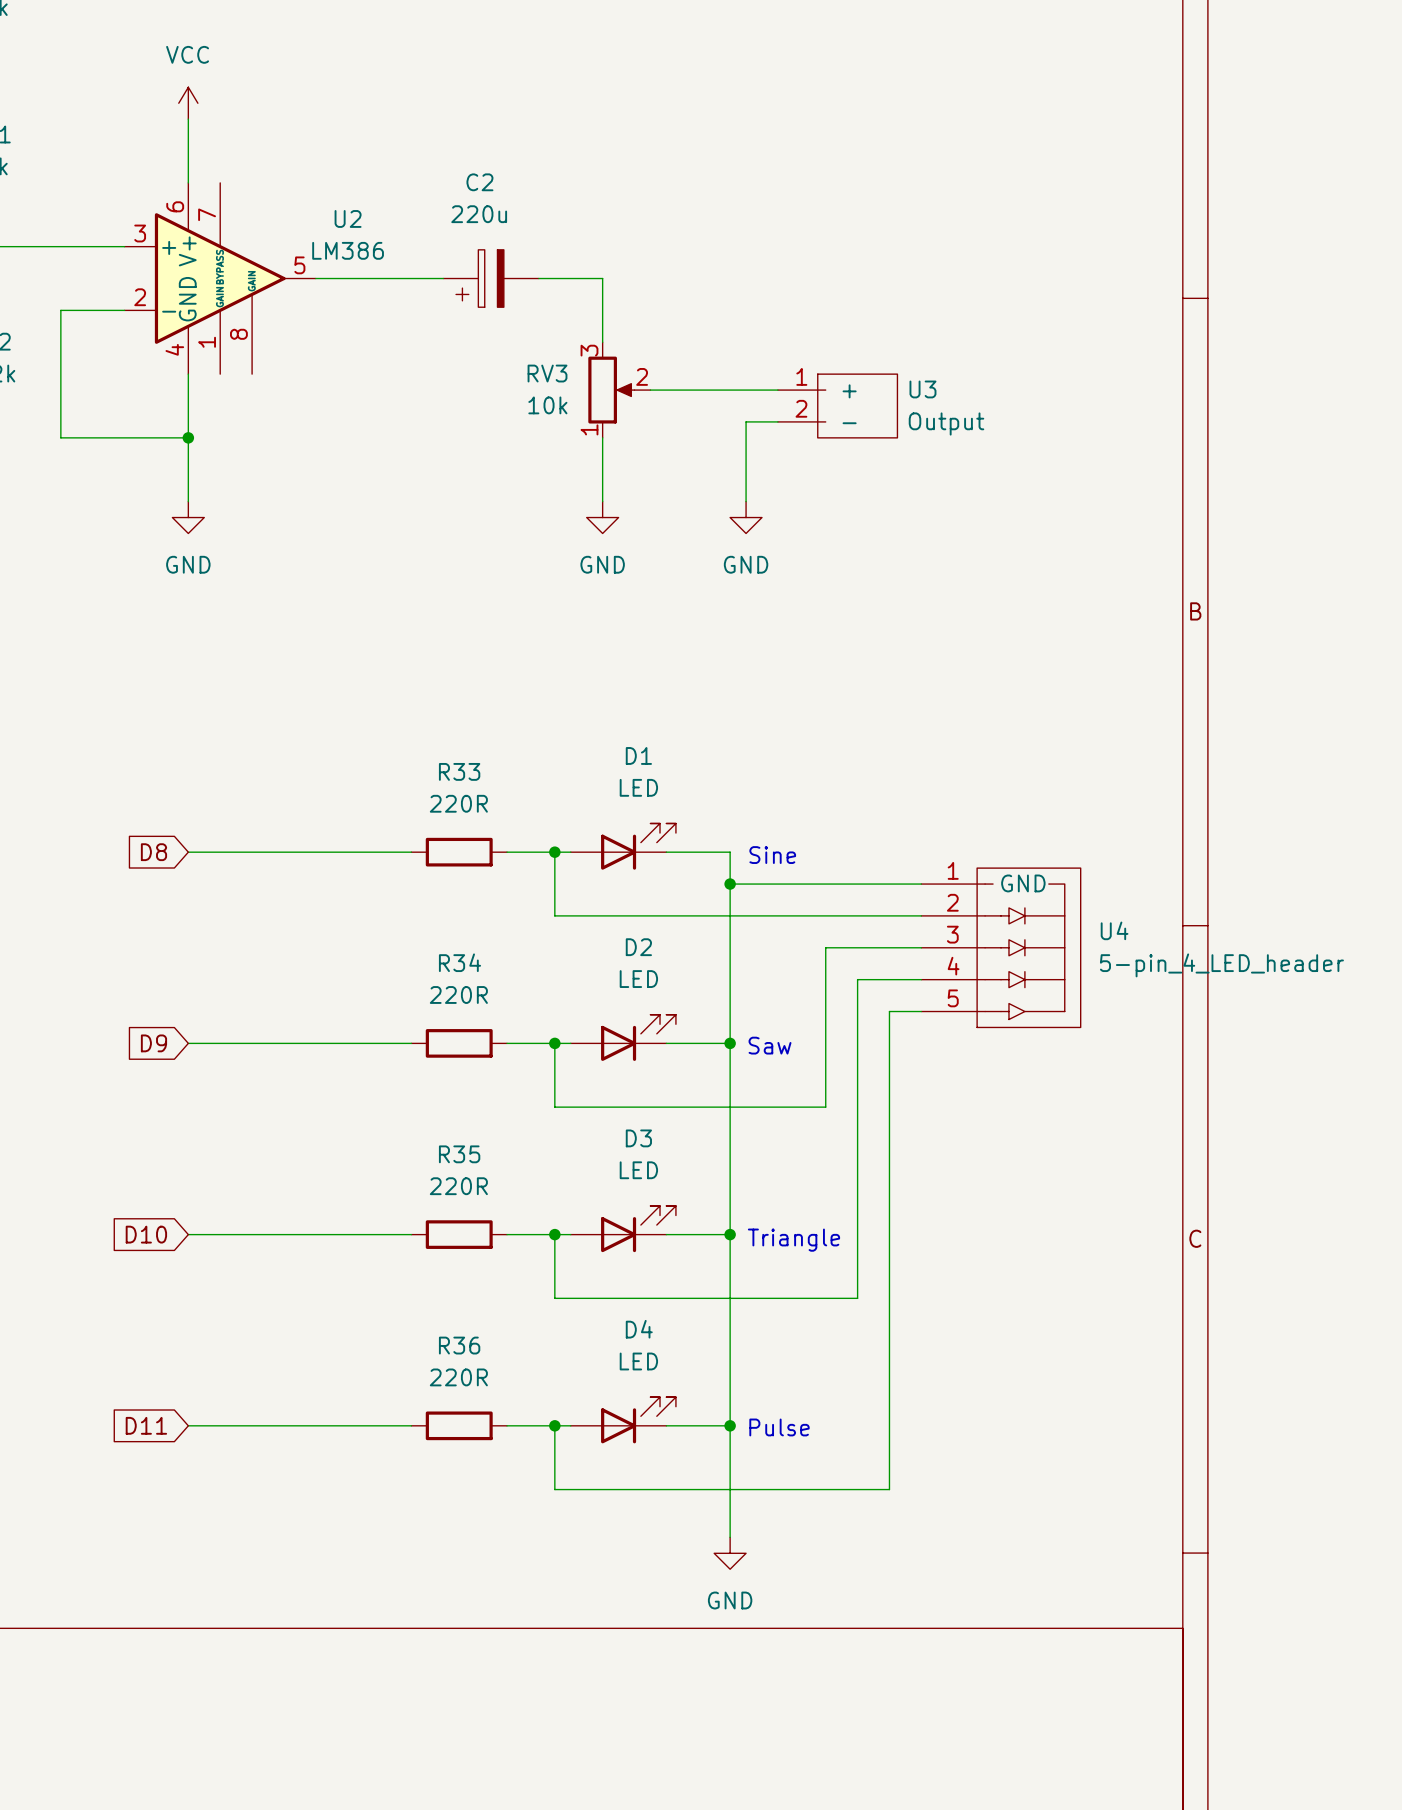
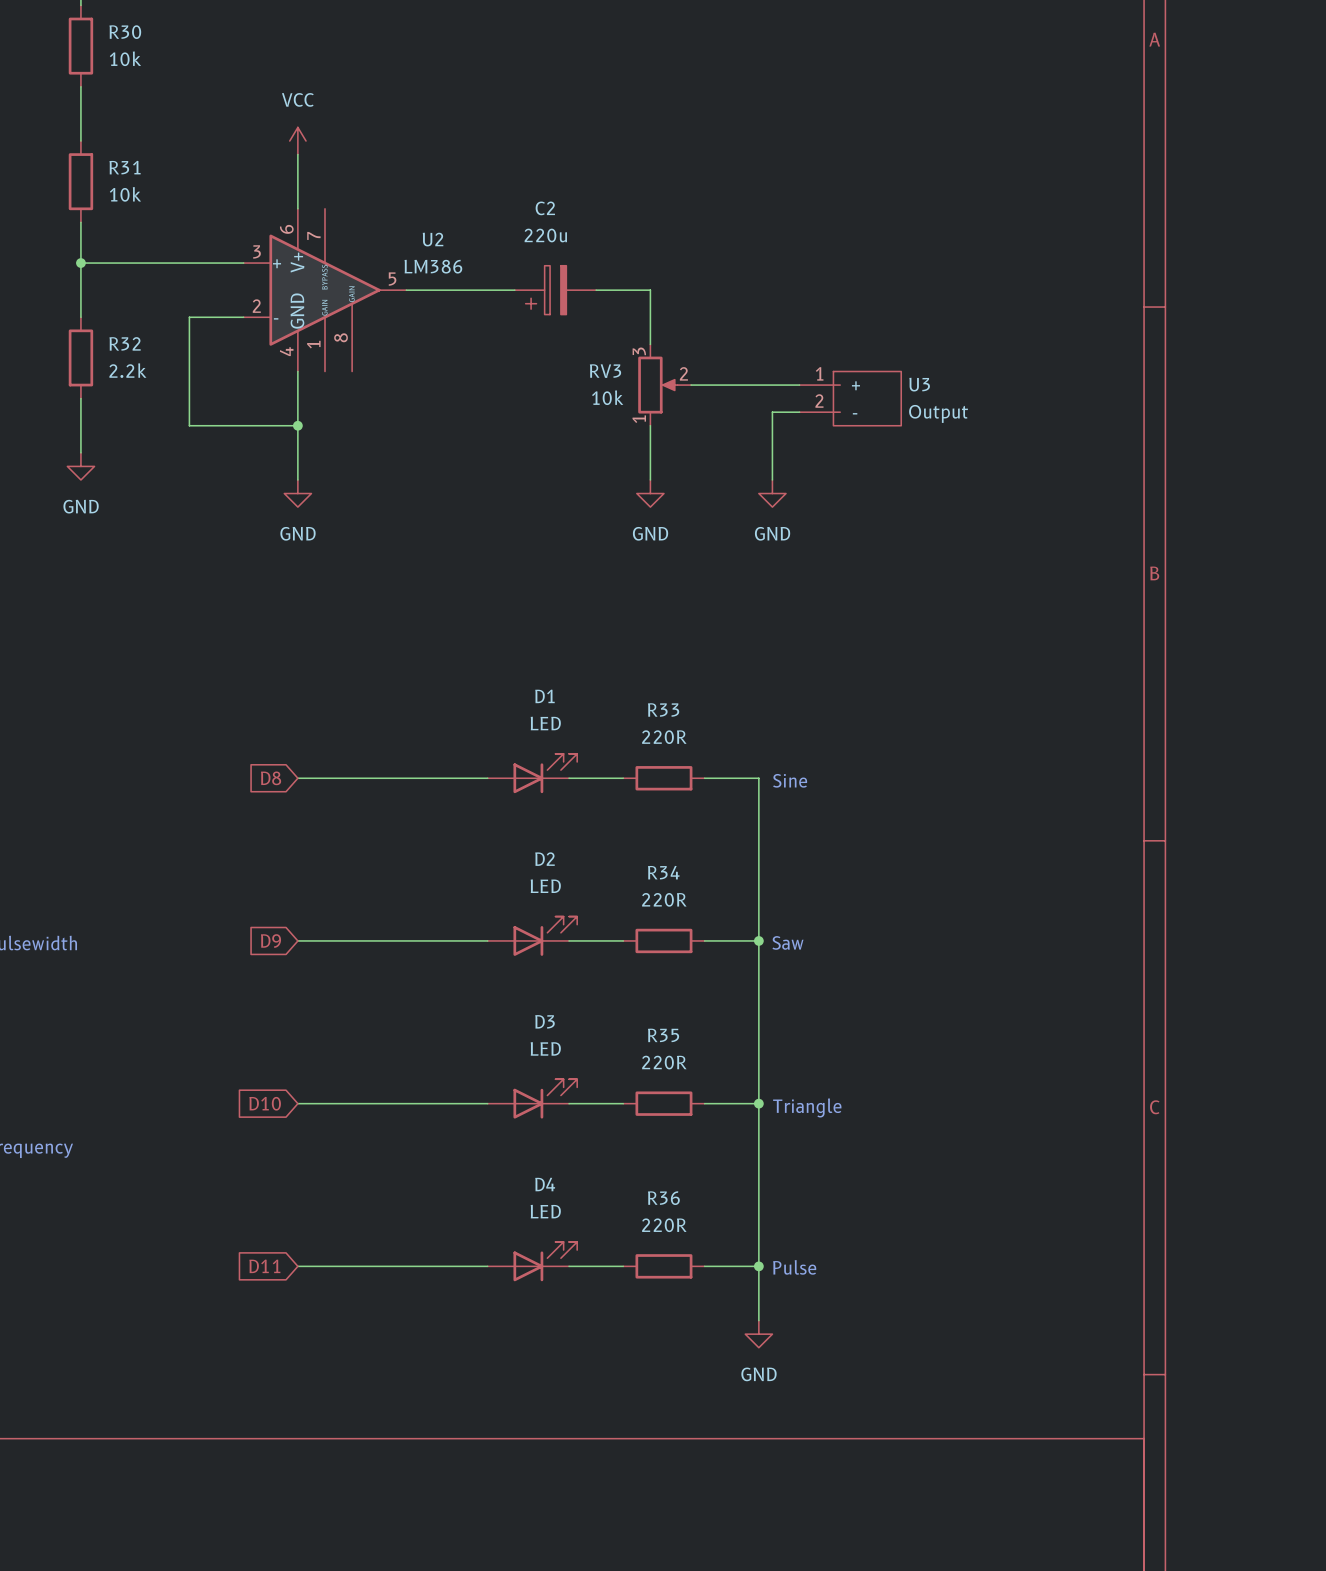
D1 position: (623, 846) -> (532, 773)
R33 position: (459, 852) -> (663, 778)
wire: (554, 852) (554, 915) (921, 915) -> none
junction: (554, 852) -> none
wire: (730, 884) (921, 884) -> none
junction: (730, 884) -> none
wire: (921, 947) (825, 947) (825, 1107) (554, 1107) (554, 1043) -> none
U4: 5-pin_4_LED_header (1001, 947) -> none
wire: (921, 979) (857, 979) (857, 1298) (554, 1298) (554, 1234) -> none
wire: (921, 1011) (889, 1011) (889, 1489) (554, 1489) (554, 1425) -> none
D2 position: (623, 1037) -> (532, 936)
R34 position: (459, 1043) -> (663, 940)
junction: (554, 1043) -> none
D3 position: (623, 1229) -> (532, 1098)
R35 position: (459, 1234) -> (663, 1103)
junction: (554, 1234) -> none
D4 position: (623, 1420) -> (532, 1261)
R36 position: (459, 1425) -> (663, 1266)
junction: (554, 1425) -> none
wire: (730, 1489) (730, 1537) -> none
power symbol position: GND (730, 1553) -> GND (758, 1334)

